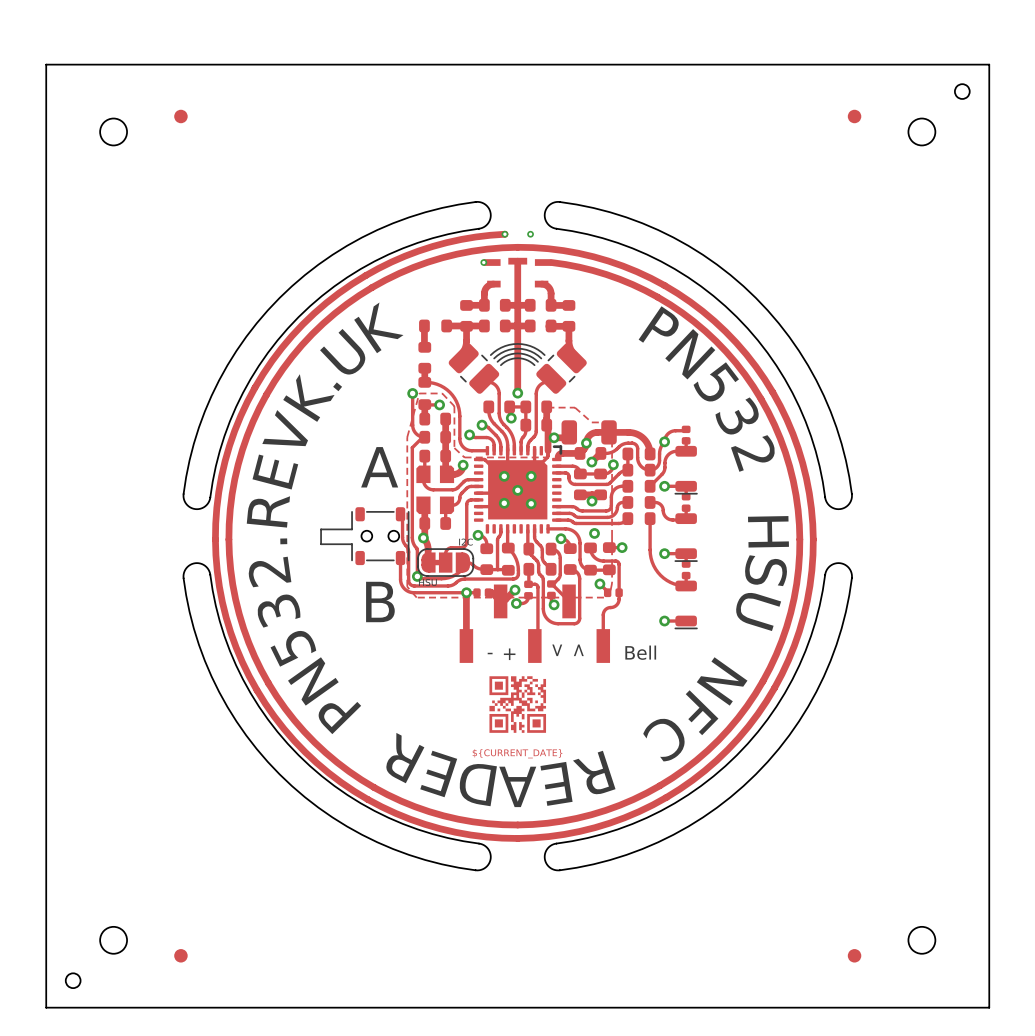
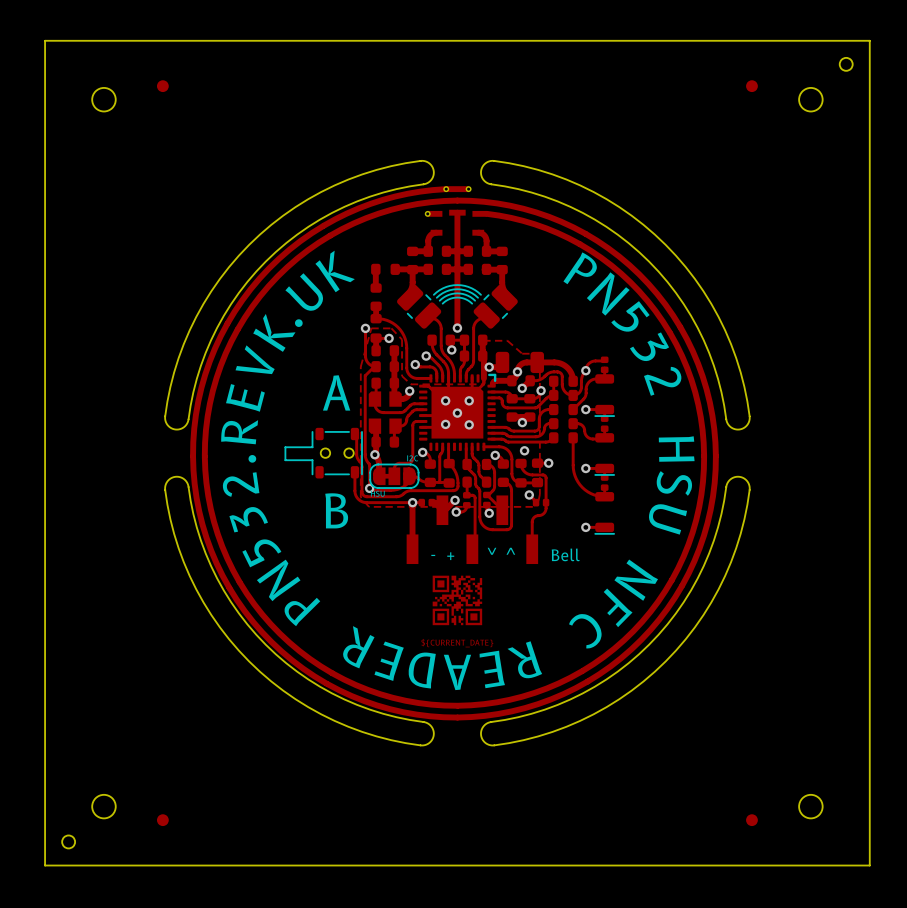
part footprint: [212, 230, 817, 842] -> [190, 186, 719, 721]

